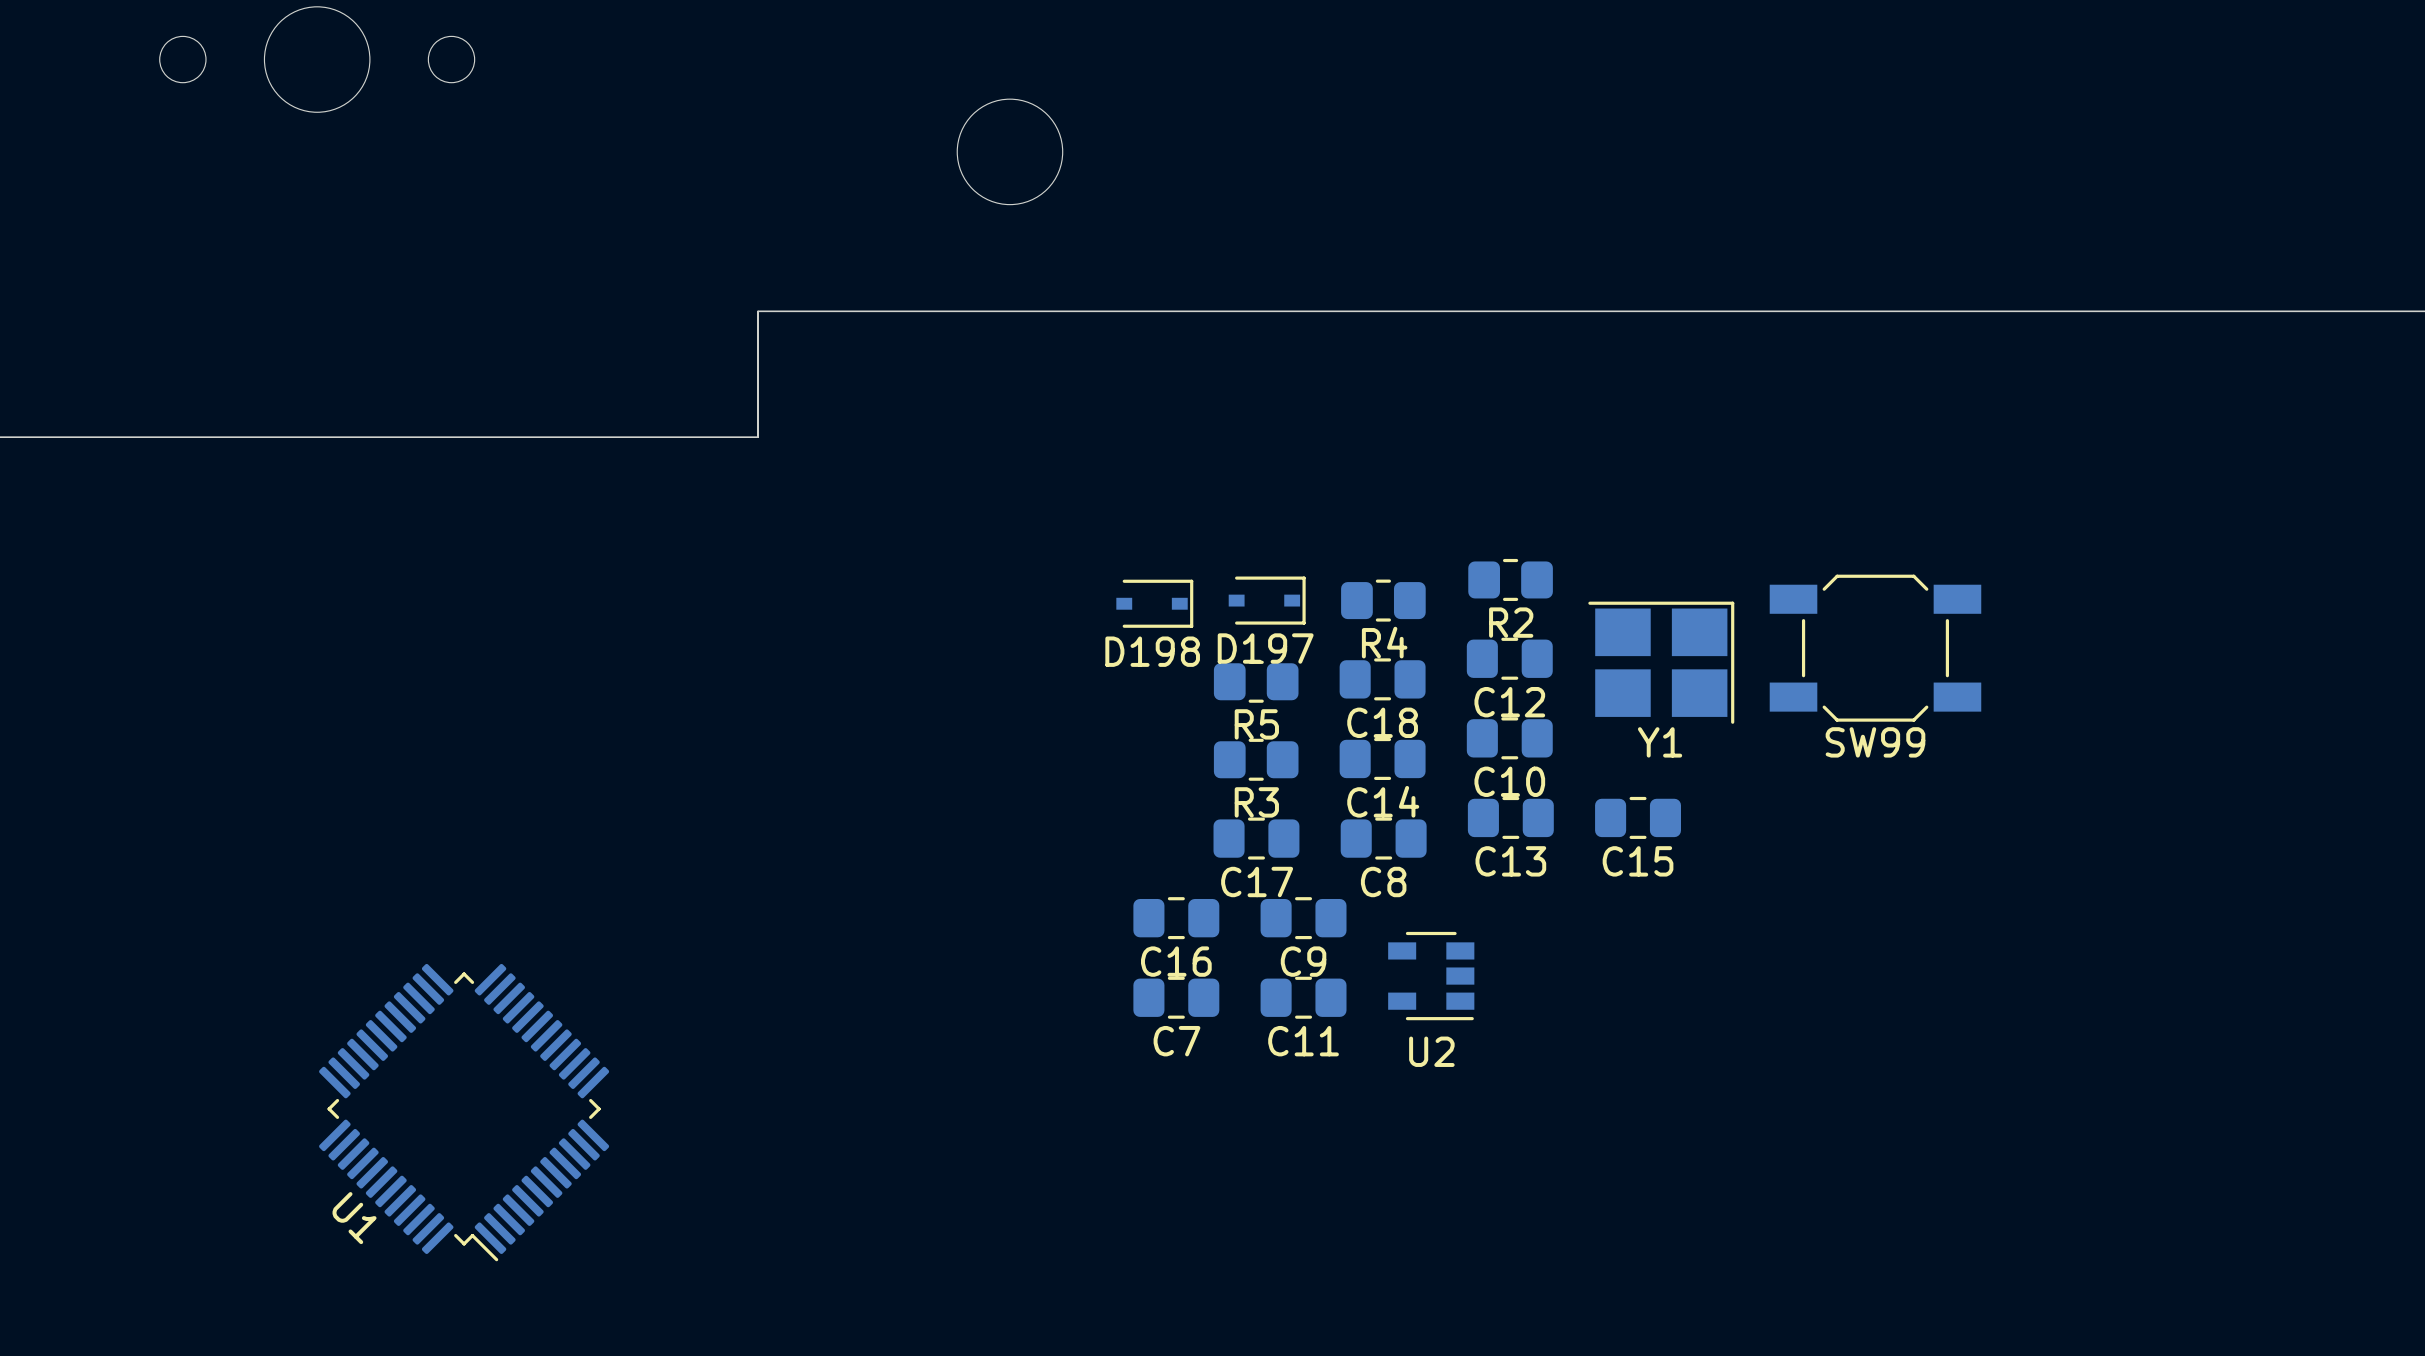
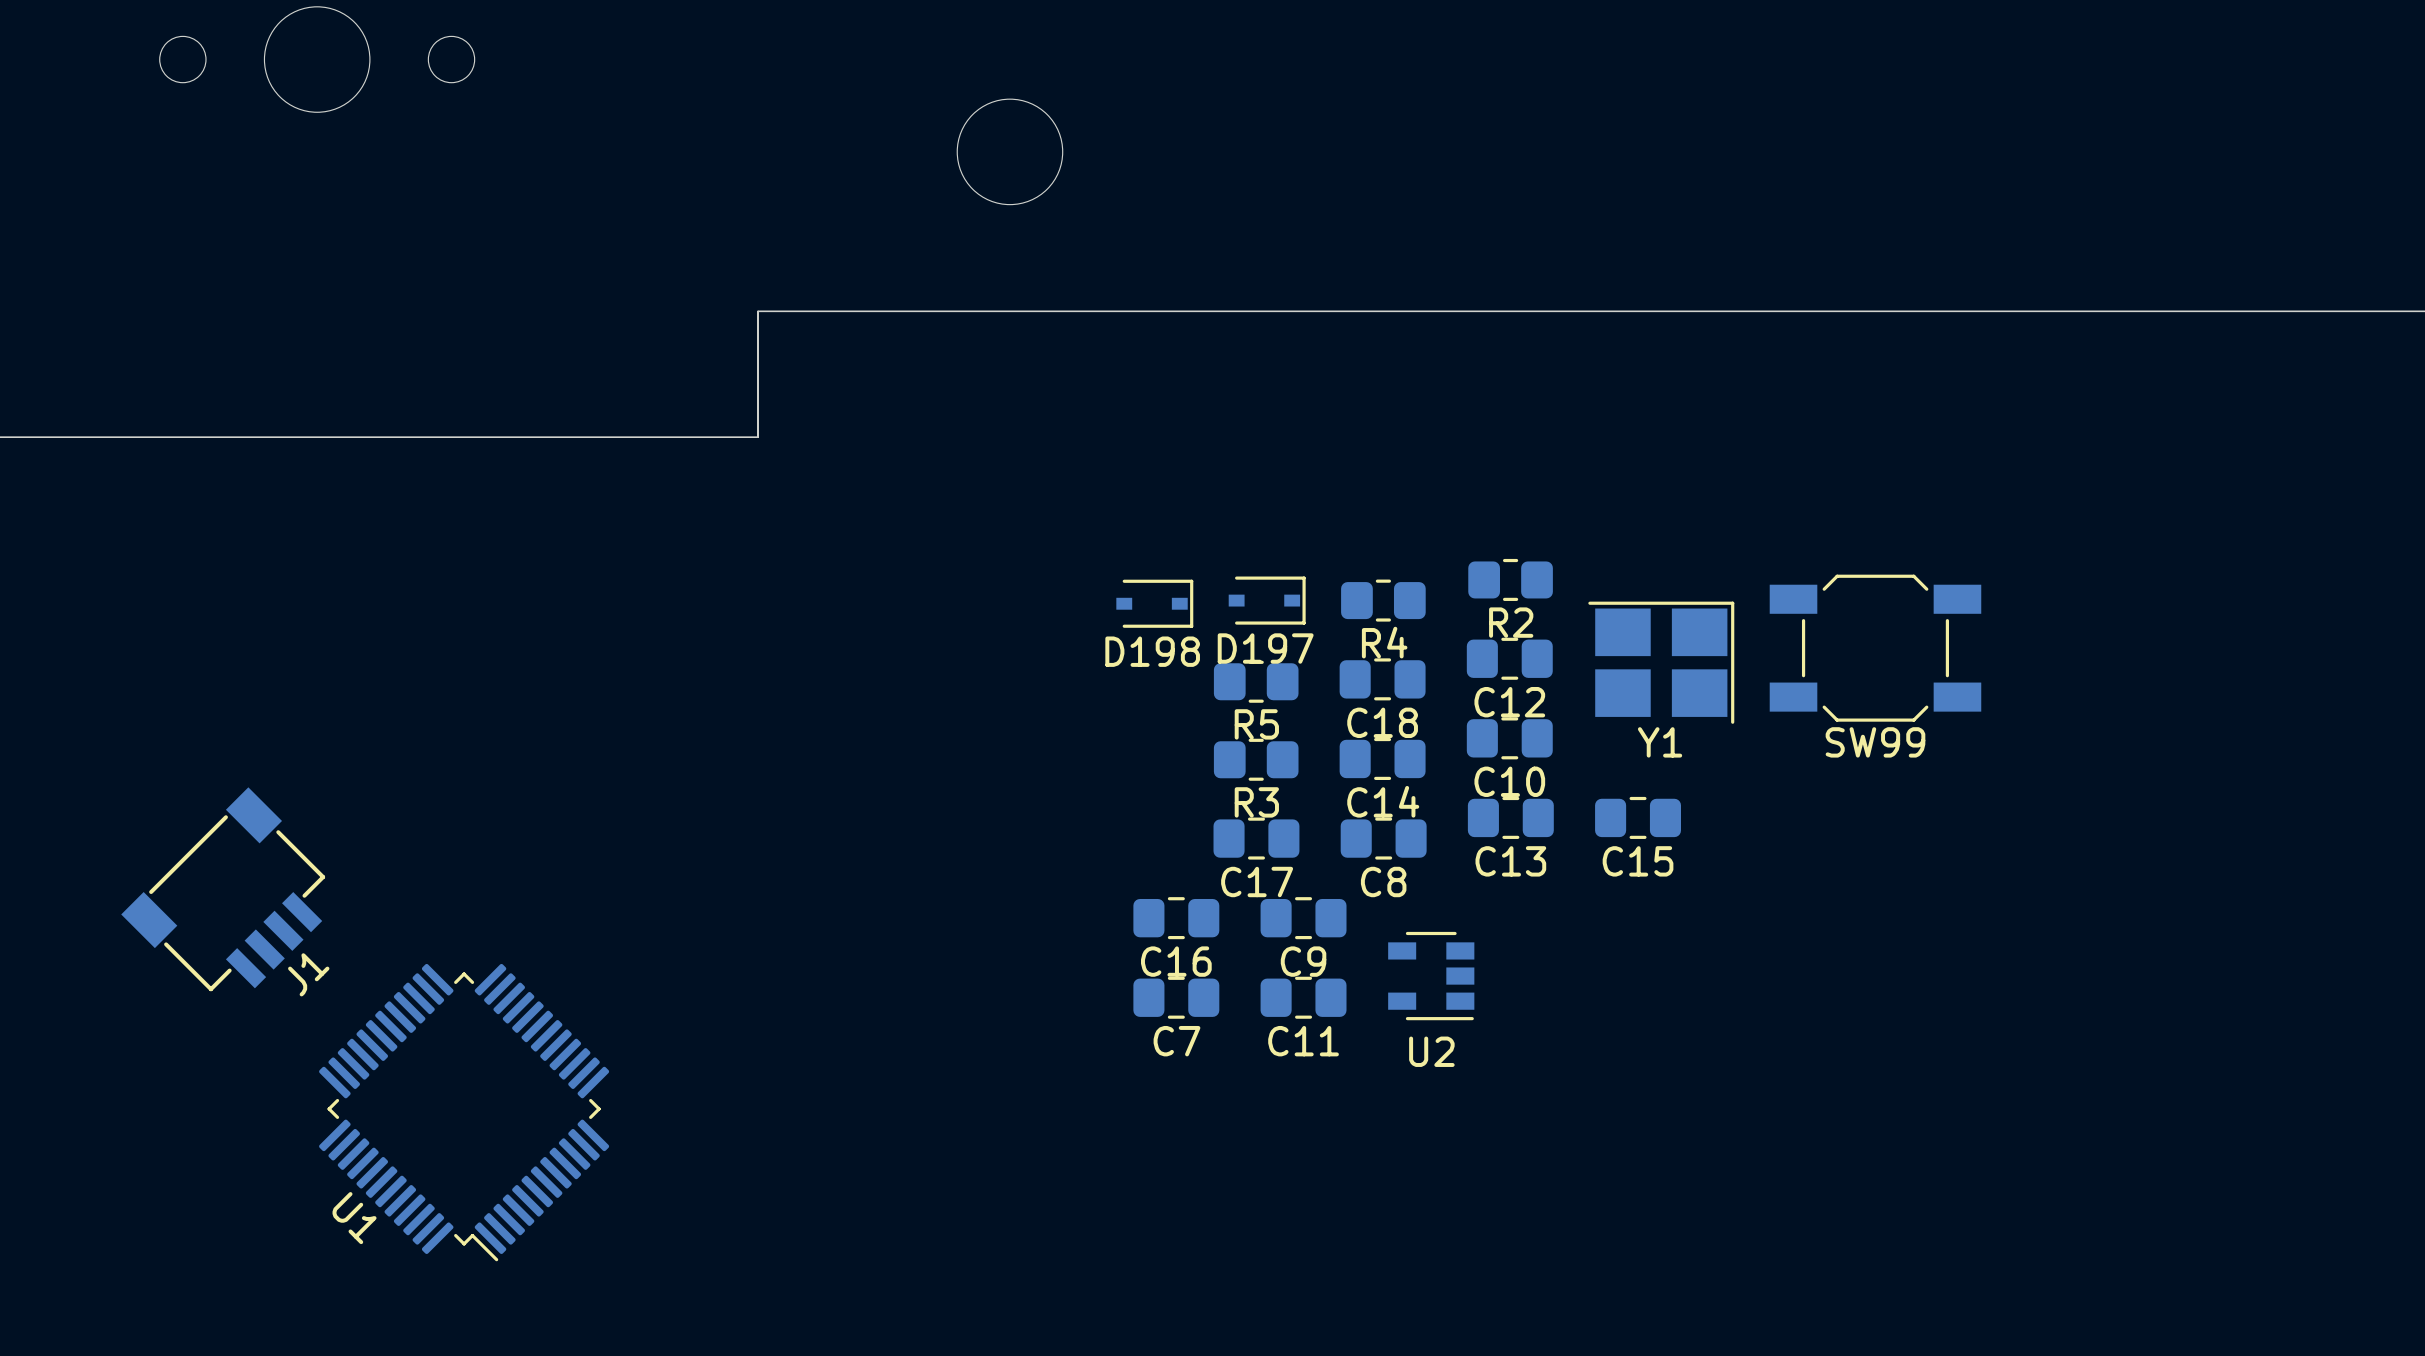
J1: none -> (223, 889)

